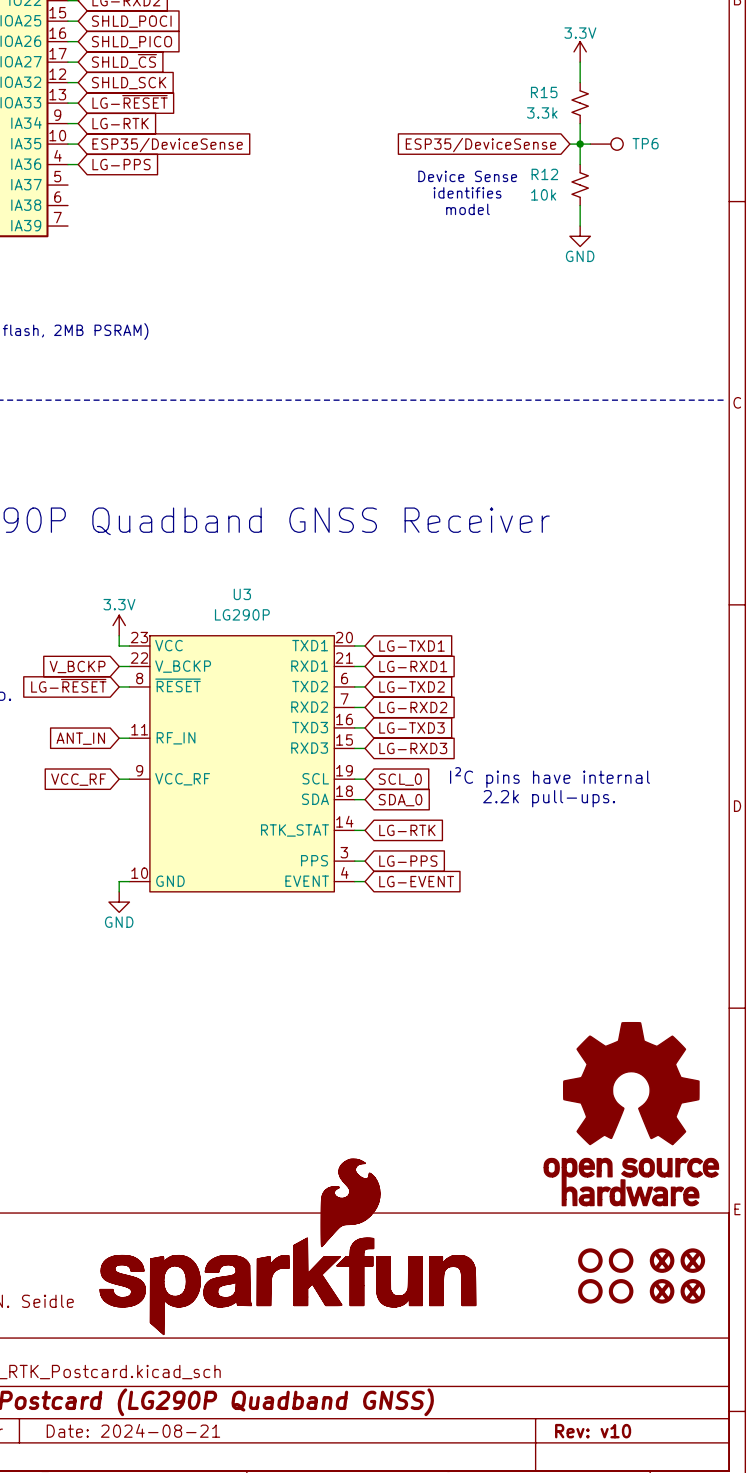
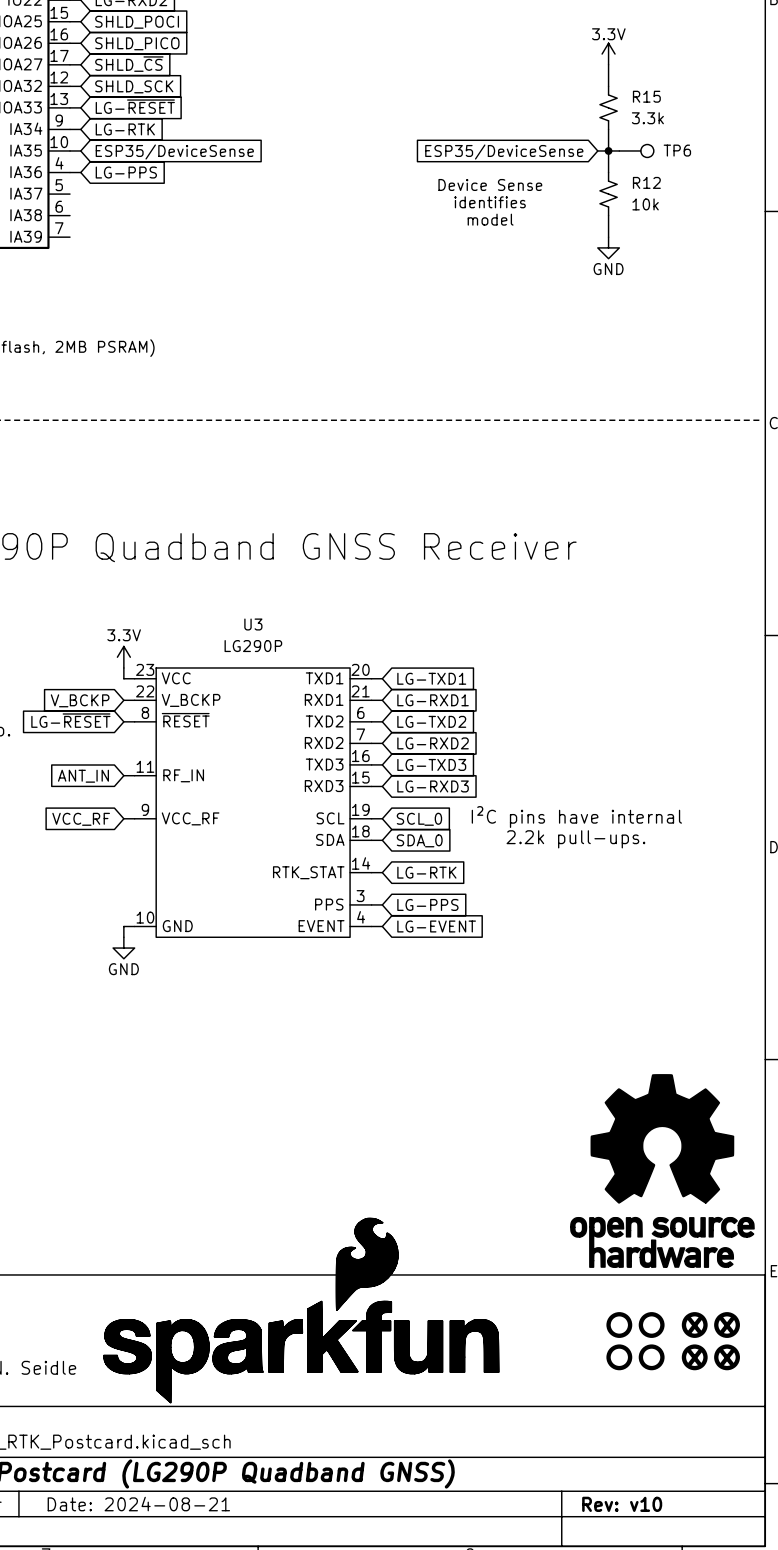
R15 name position: R15 (544, 92) -> R15 (646, 96)
R15 value position: 3.3k (542, 112) -> 3.3k (647, 118)
R12 name position: R12 (544, 174) -> R12 (646, 182)
R12 value position: 10k (543, 194) -> 10k (645, 204)

